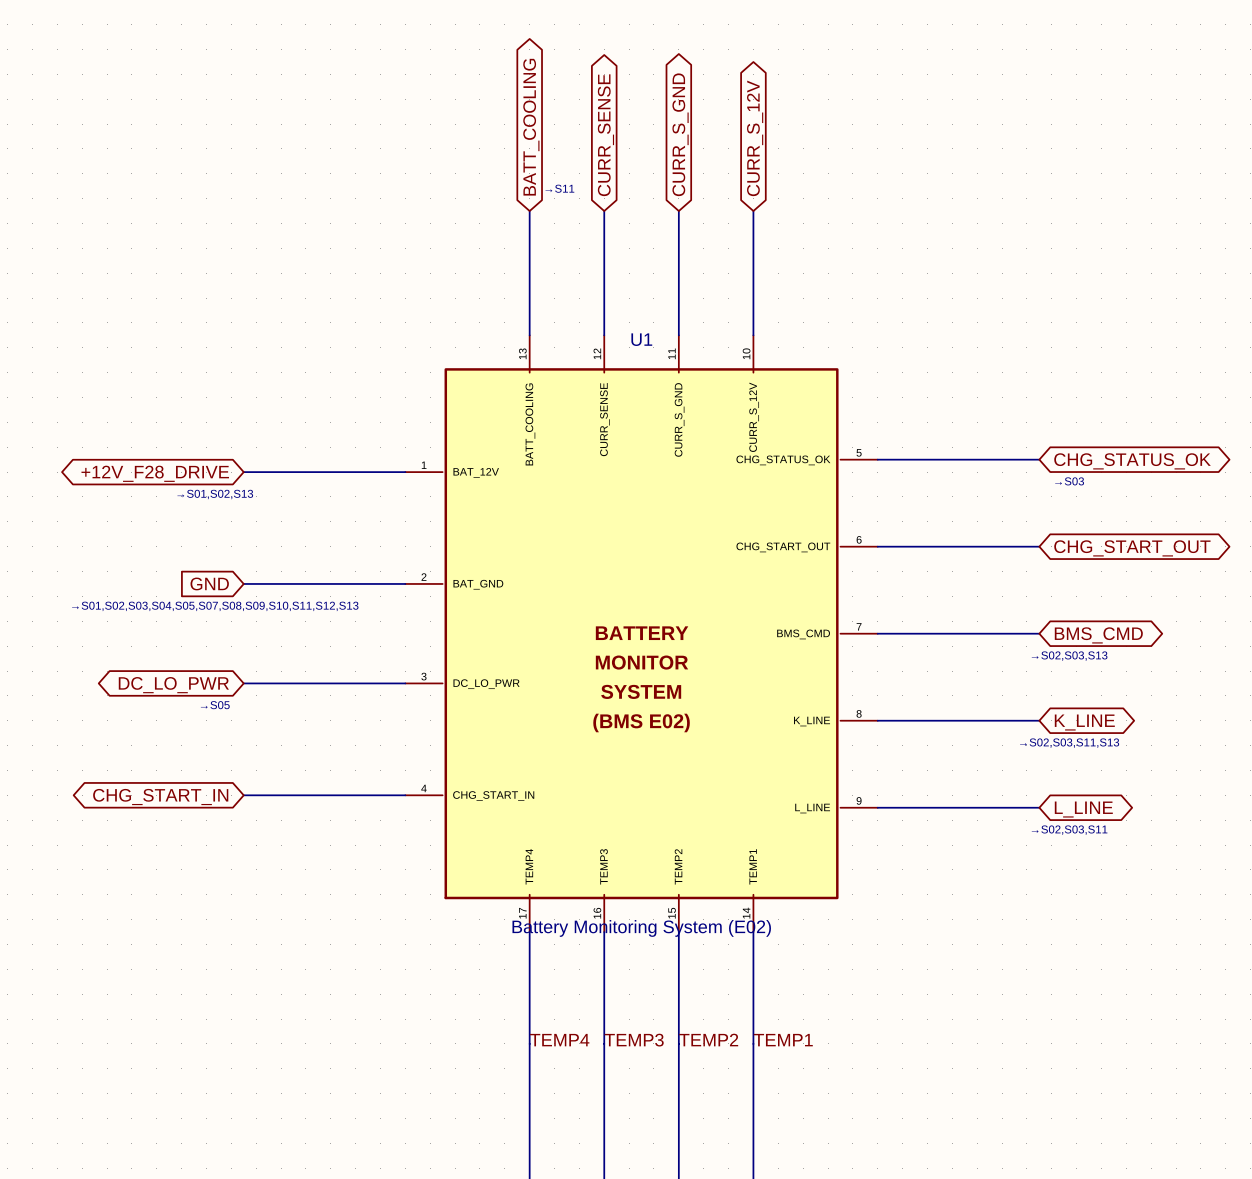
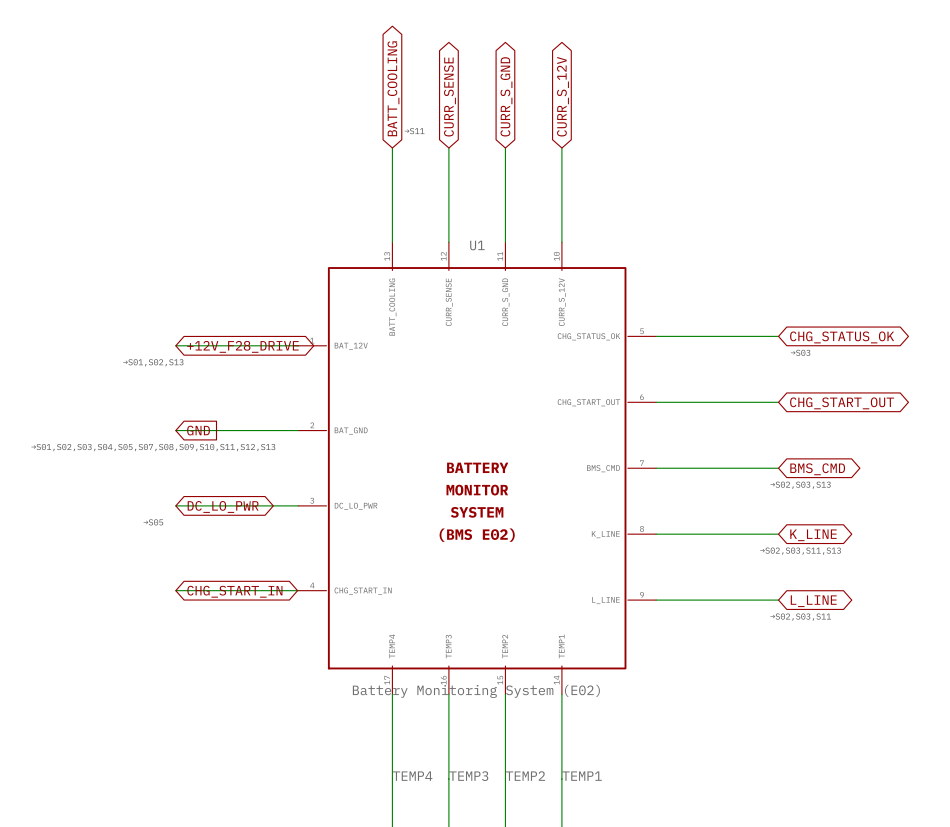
global label rotation: 0° (155, 473) -> 180° (242, 346)
global label rotation: 0° (209, 583) -> 180° (198, 430)
global label rotation: 0° (173, 685) -> 180° (223, 506)
global label rotation: 0° (160, 797) -> 180° (234, 591)

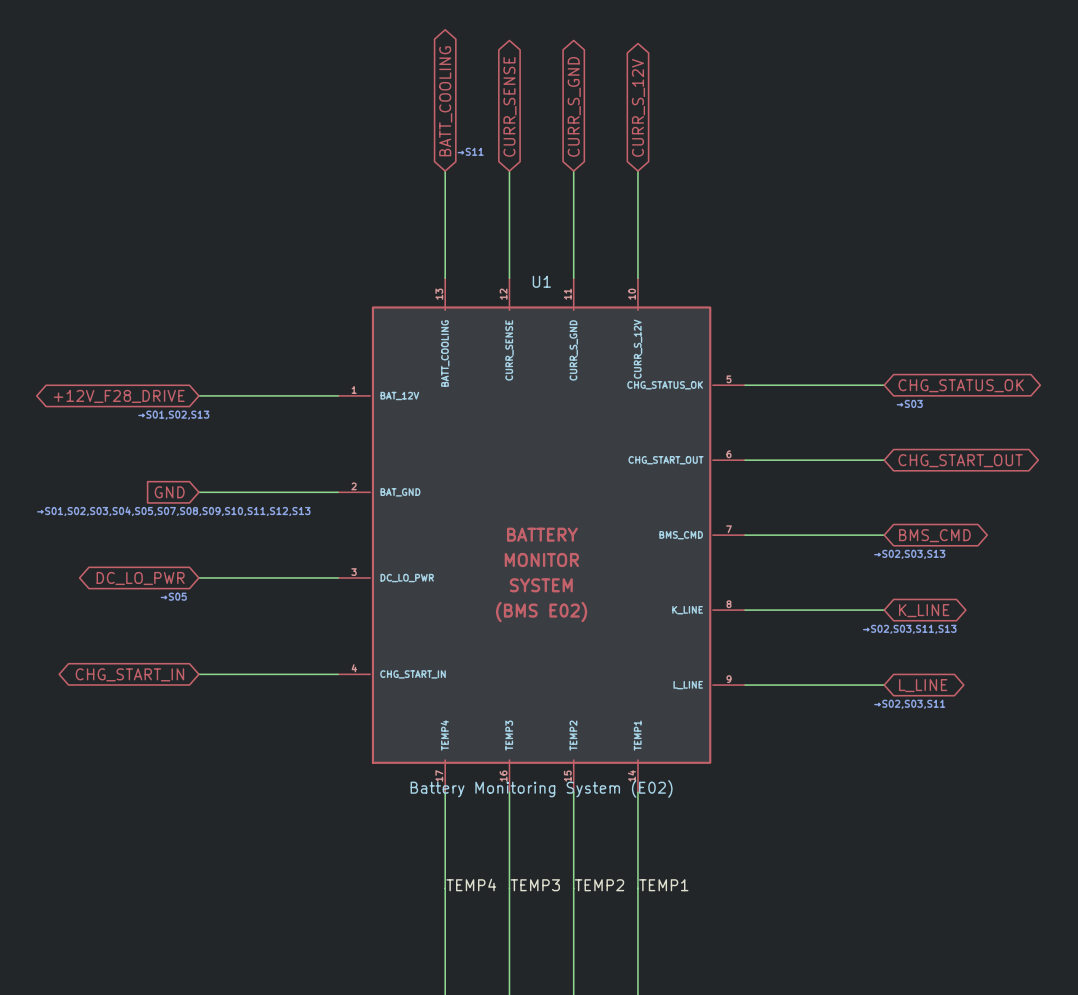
global label rotation: 0° (242, 346) -> 180° (119, 396)
global label rotation: 0° (198, 430) -> 180° (169, 492)
global label rotation: 0° (223, 506) -> 180° (140, 578)
global label rotation: 0° (234, 591) -> 180° (129, 674)

